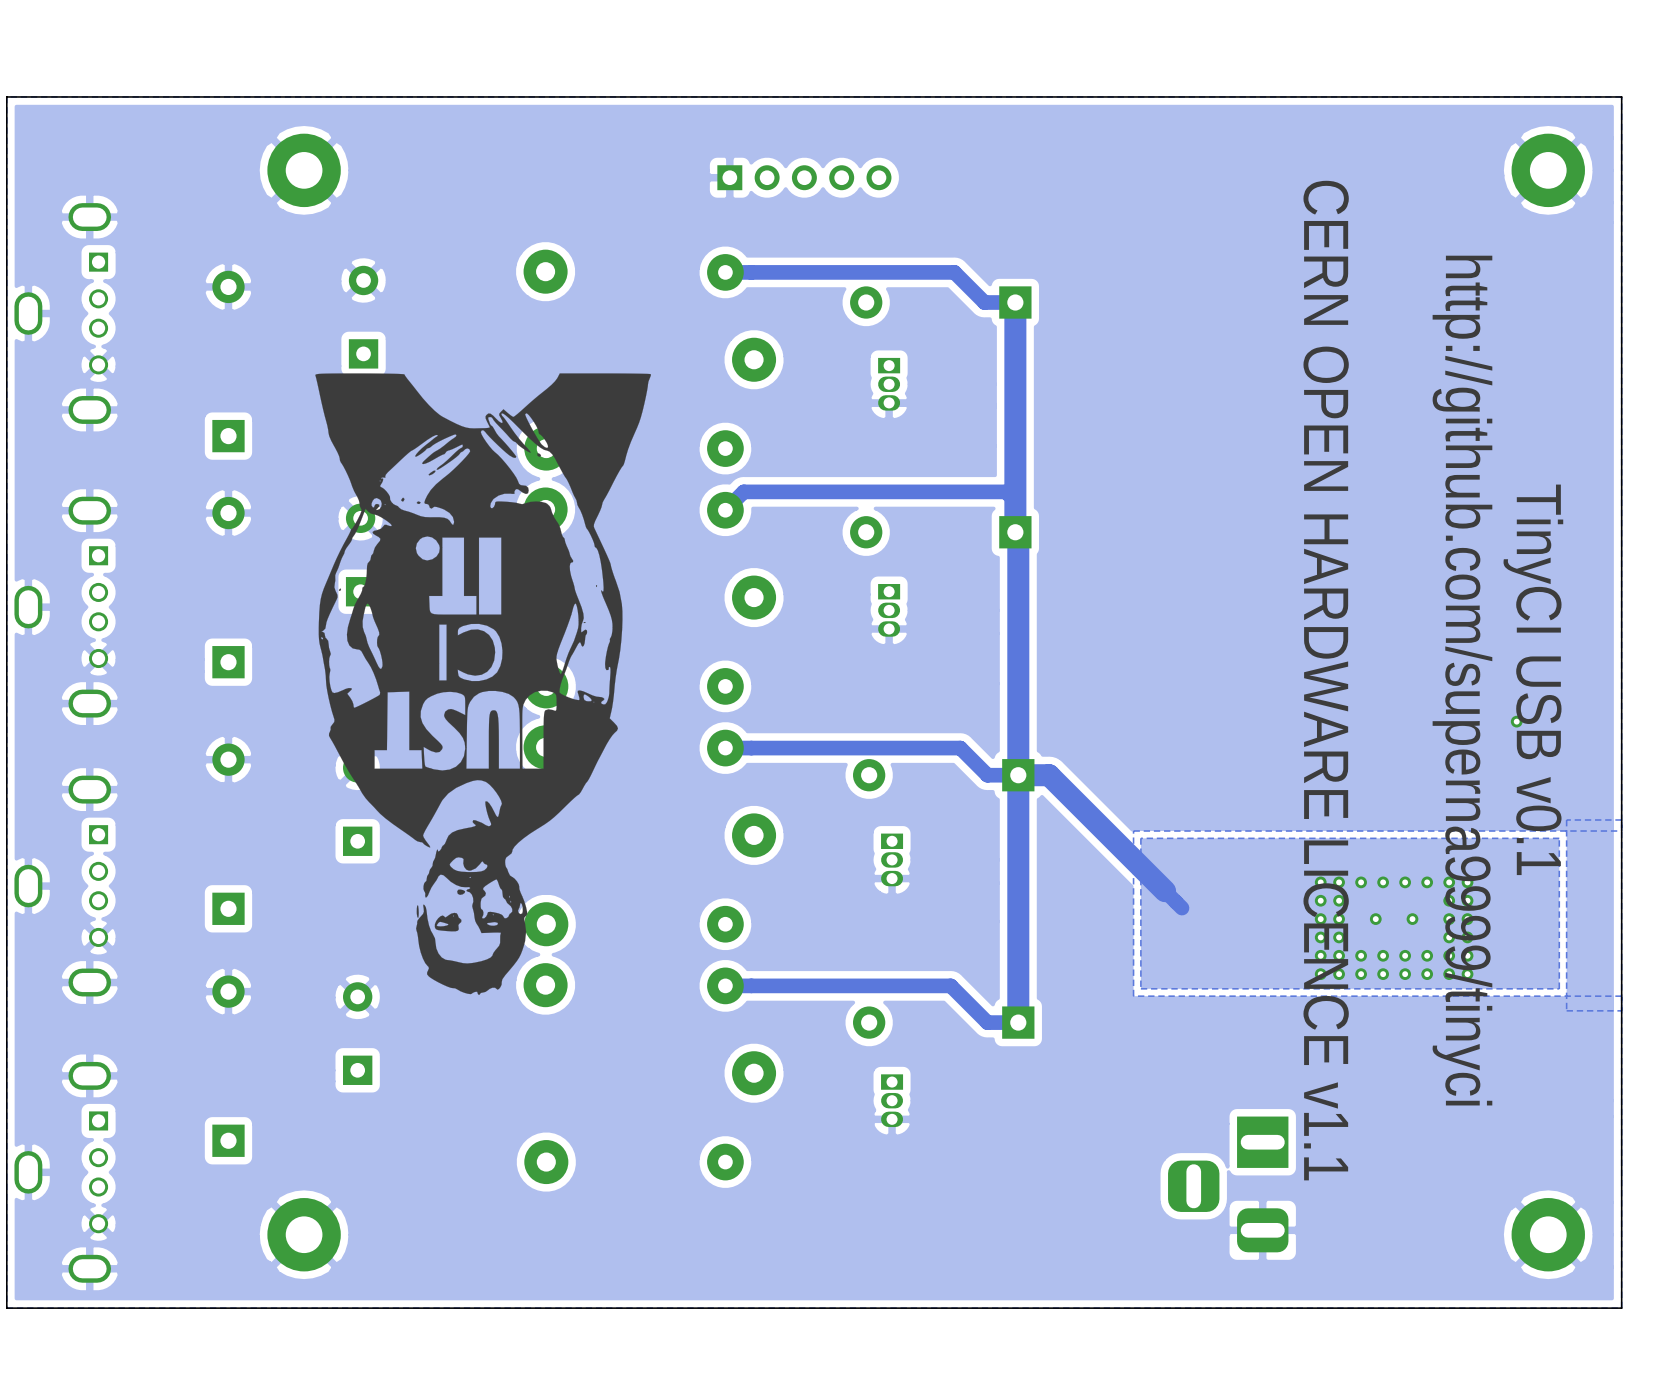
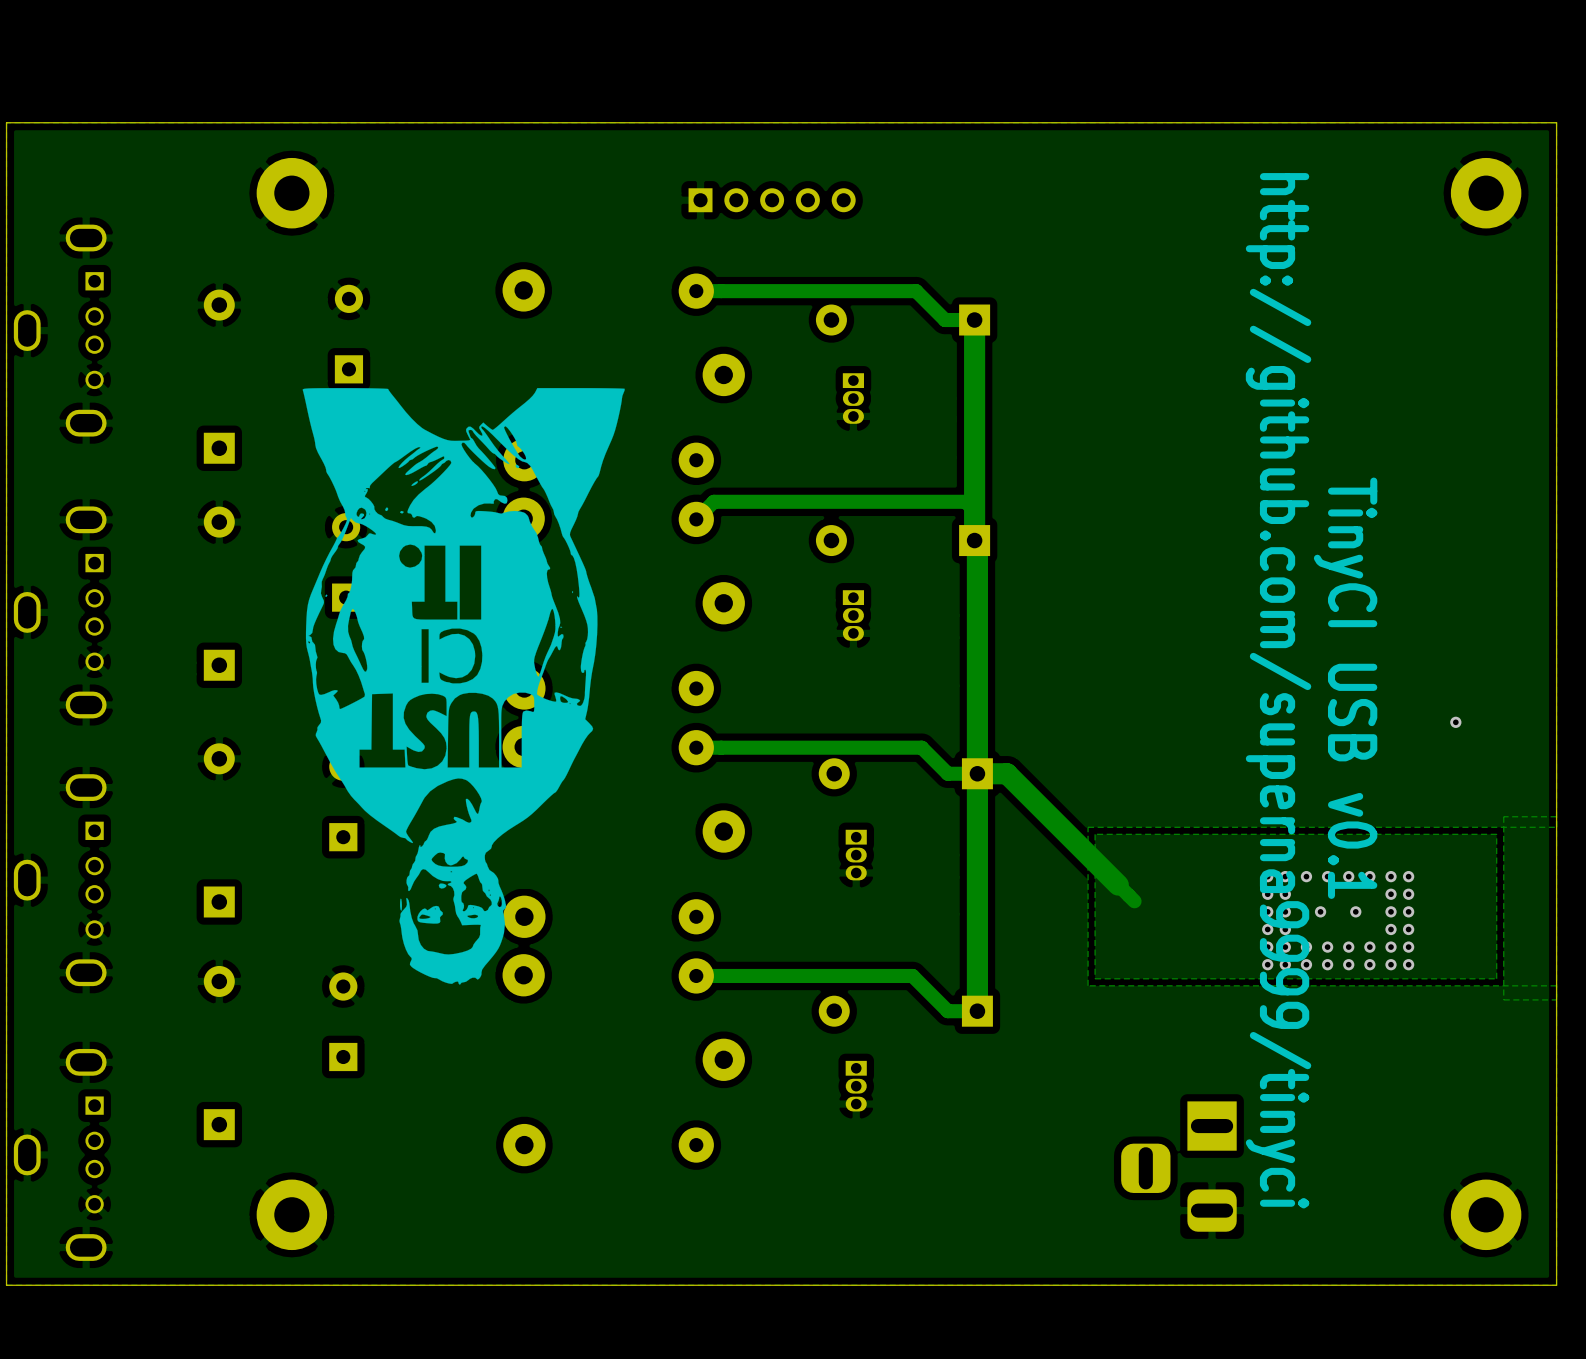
text position: TinyCI USB v0.1 (1533, 679) -> TinyCI USB v0.1 (1345, 688)
text: CERN OPEN HARDWARE LICENCE v1.1 (1326, 680) -> http://github.com/superna9999/tinyci (1278, 690)
text: http://github.com/superna9999/tinyci (1462, 680) -> none

